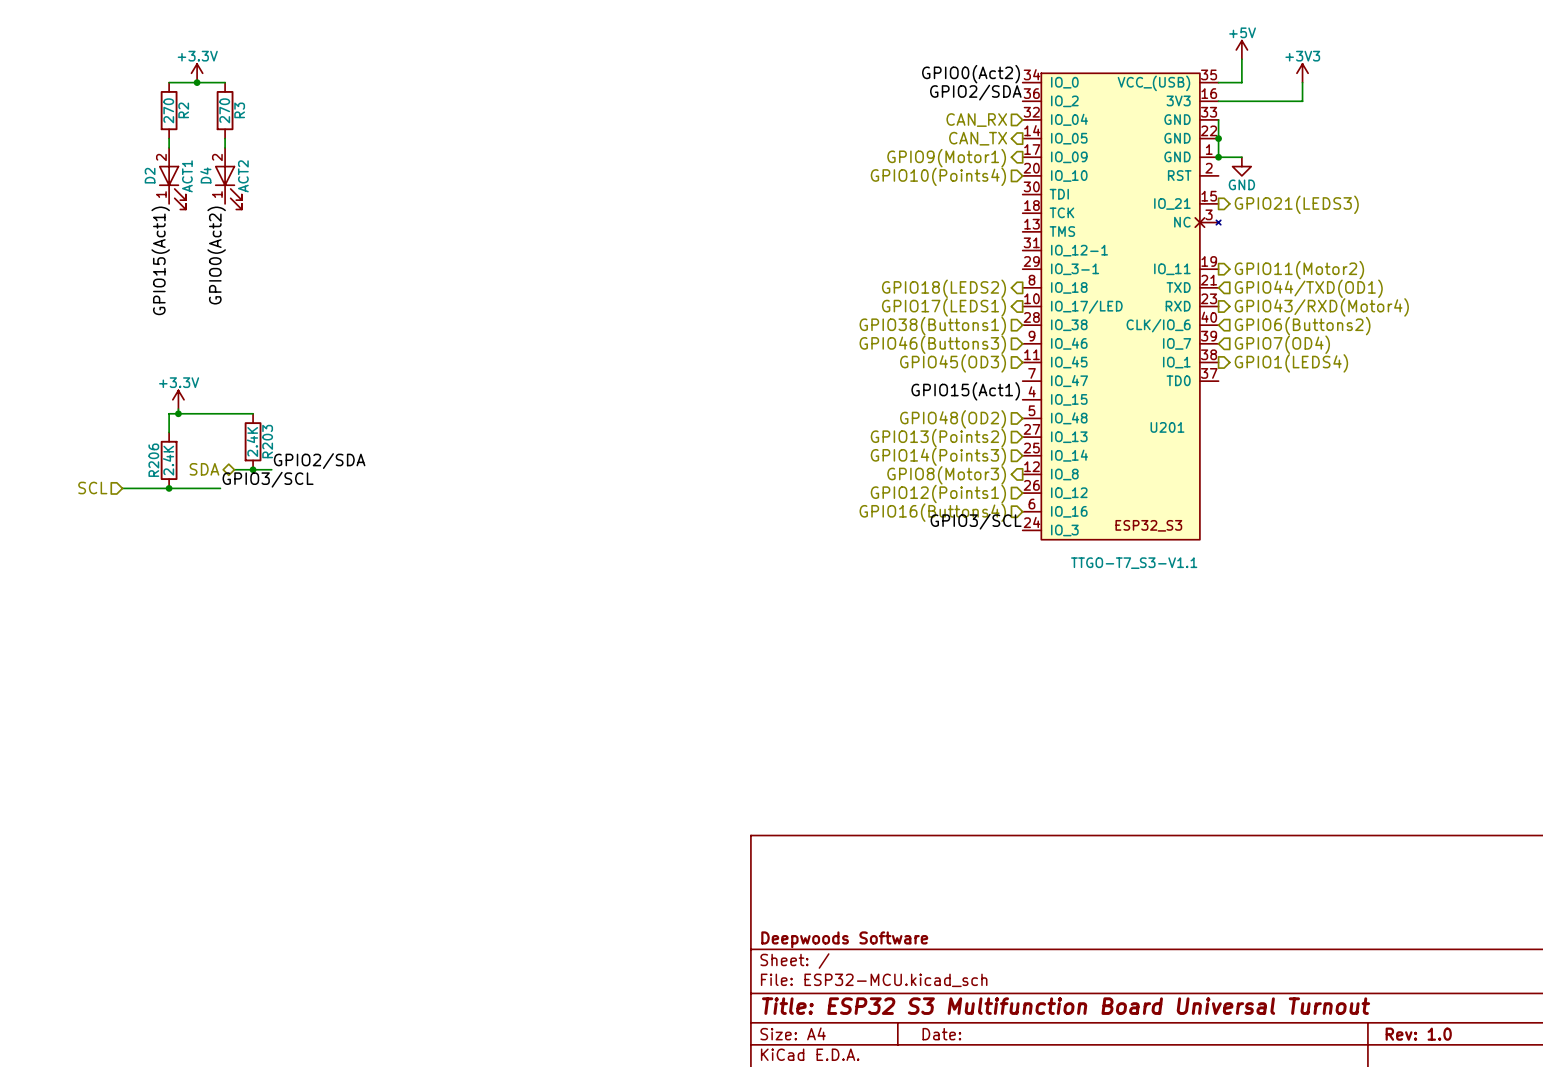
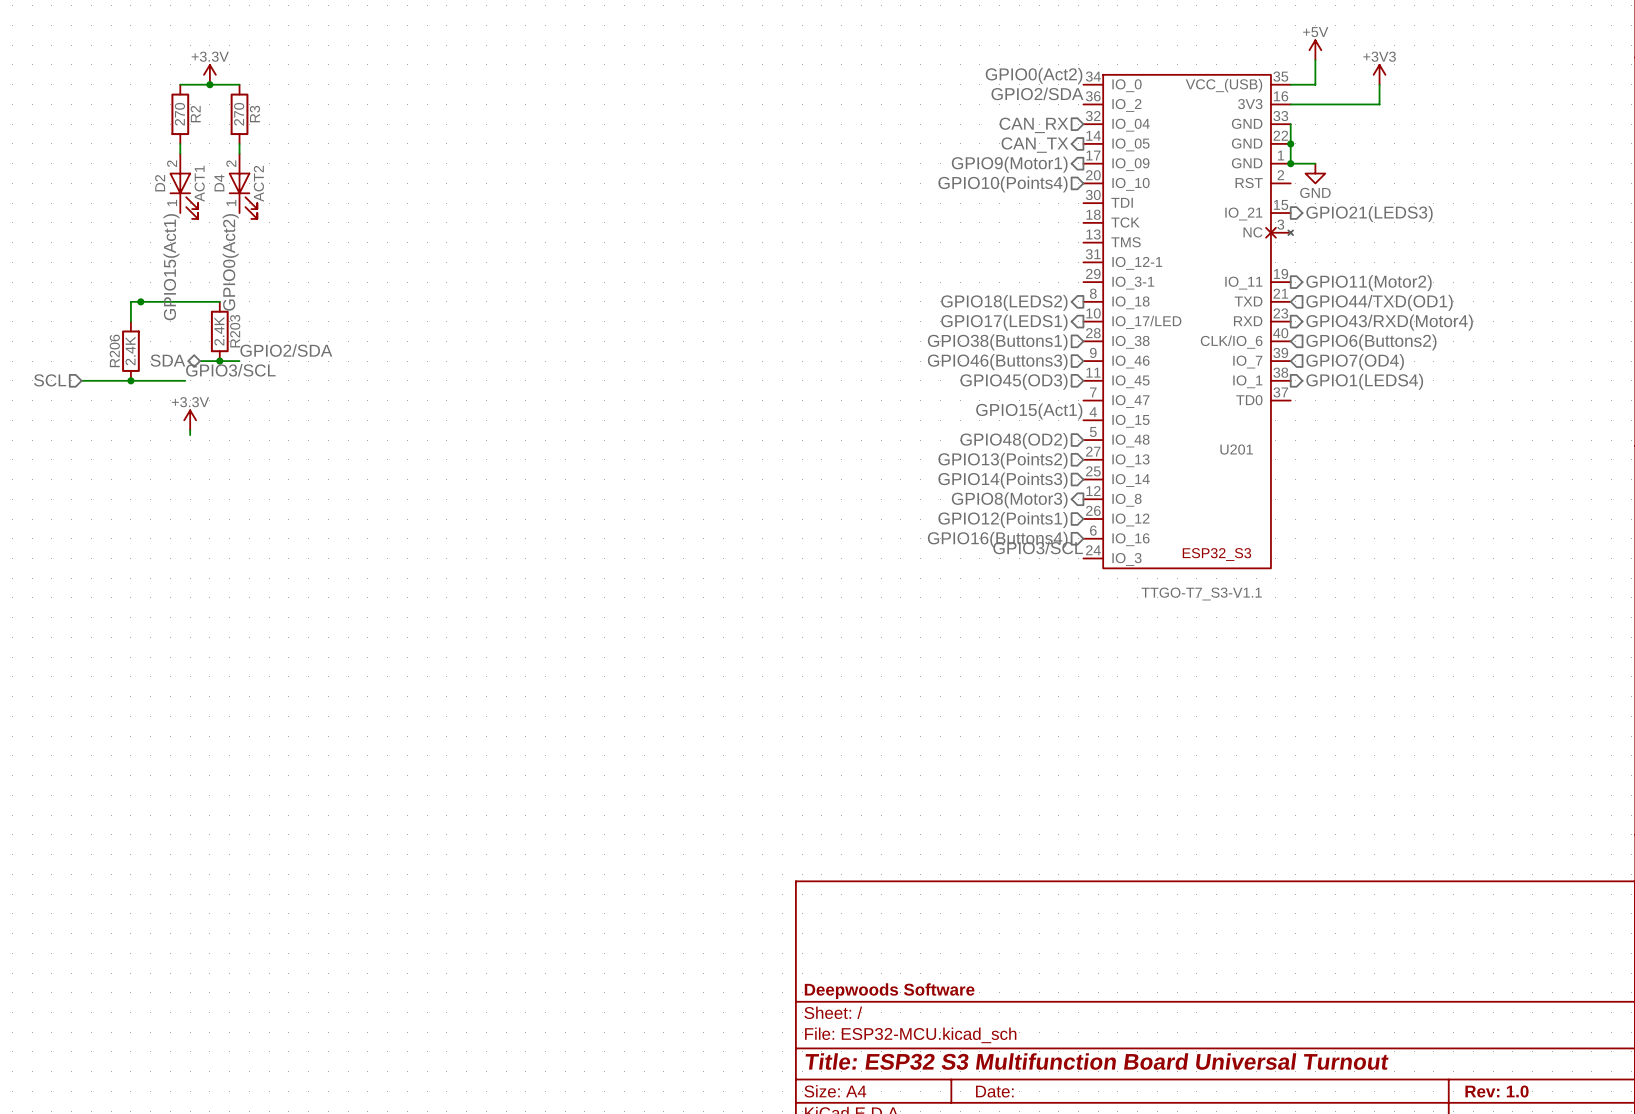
junction: none -> (140, 301)
junction: none -> (219, 361)
junction: none -> (130, 380)
junction: (178, 413) -> none
wire: (253, 413) (169, 413) (169, 432) -> (219, 301) (130, 301) (130, 321)
R203 position: (253, 441) -> (219, 331)
R206 position: (169, 460) -> (130, 351)
label position: GPIO2/SDA (319, 461) -> GPIO2/SDA (286, 350)
hierarchical label position: SDA (204, 469) -> SDA (167, 360)
wire: (234, 469) (271, 469) -> (200, 361) (239, 361)
junction: (253, 469) -> none
label position: GPIO3/SCL (268, 479) -> GPIO3/SCL (230, 370)
hierarchical label position: SCL (92, 487) -> SCL (50, 380)
wire: (122, 488) (220, 488) -> (81, 380) (185, 380)
junction: (169, 488) -> none

